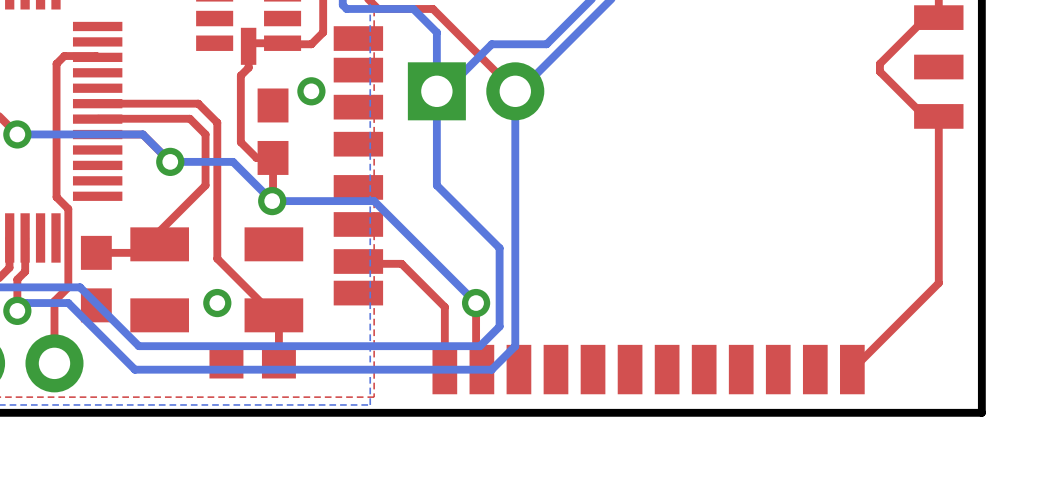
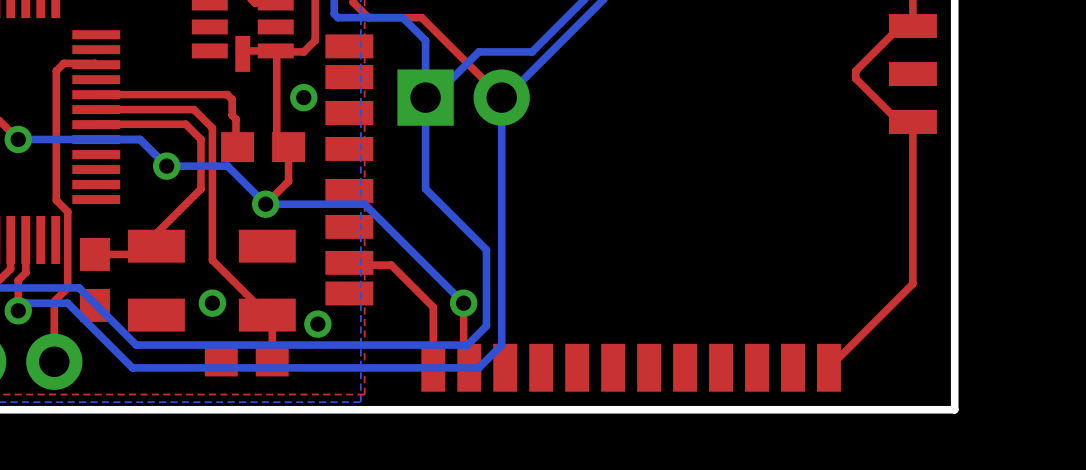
top track: (248, 46) (248, 67) (240, 75) (240, 142) (256, 157) (273, 157) (273, 200) -> (276, 51) (276, 135) (288, 147) (288, 181) (266, 203)
top track: none -> (96, 94) (227, 94) (232, 99) (232, 115) (236, 119) (236, 145) (237, 147)
part rotation: 0° (273, 131) -> 90° clockwise (263, 147)
via: none -> (317, 324)

